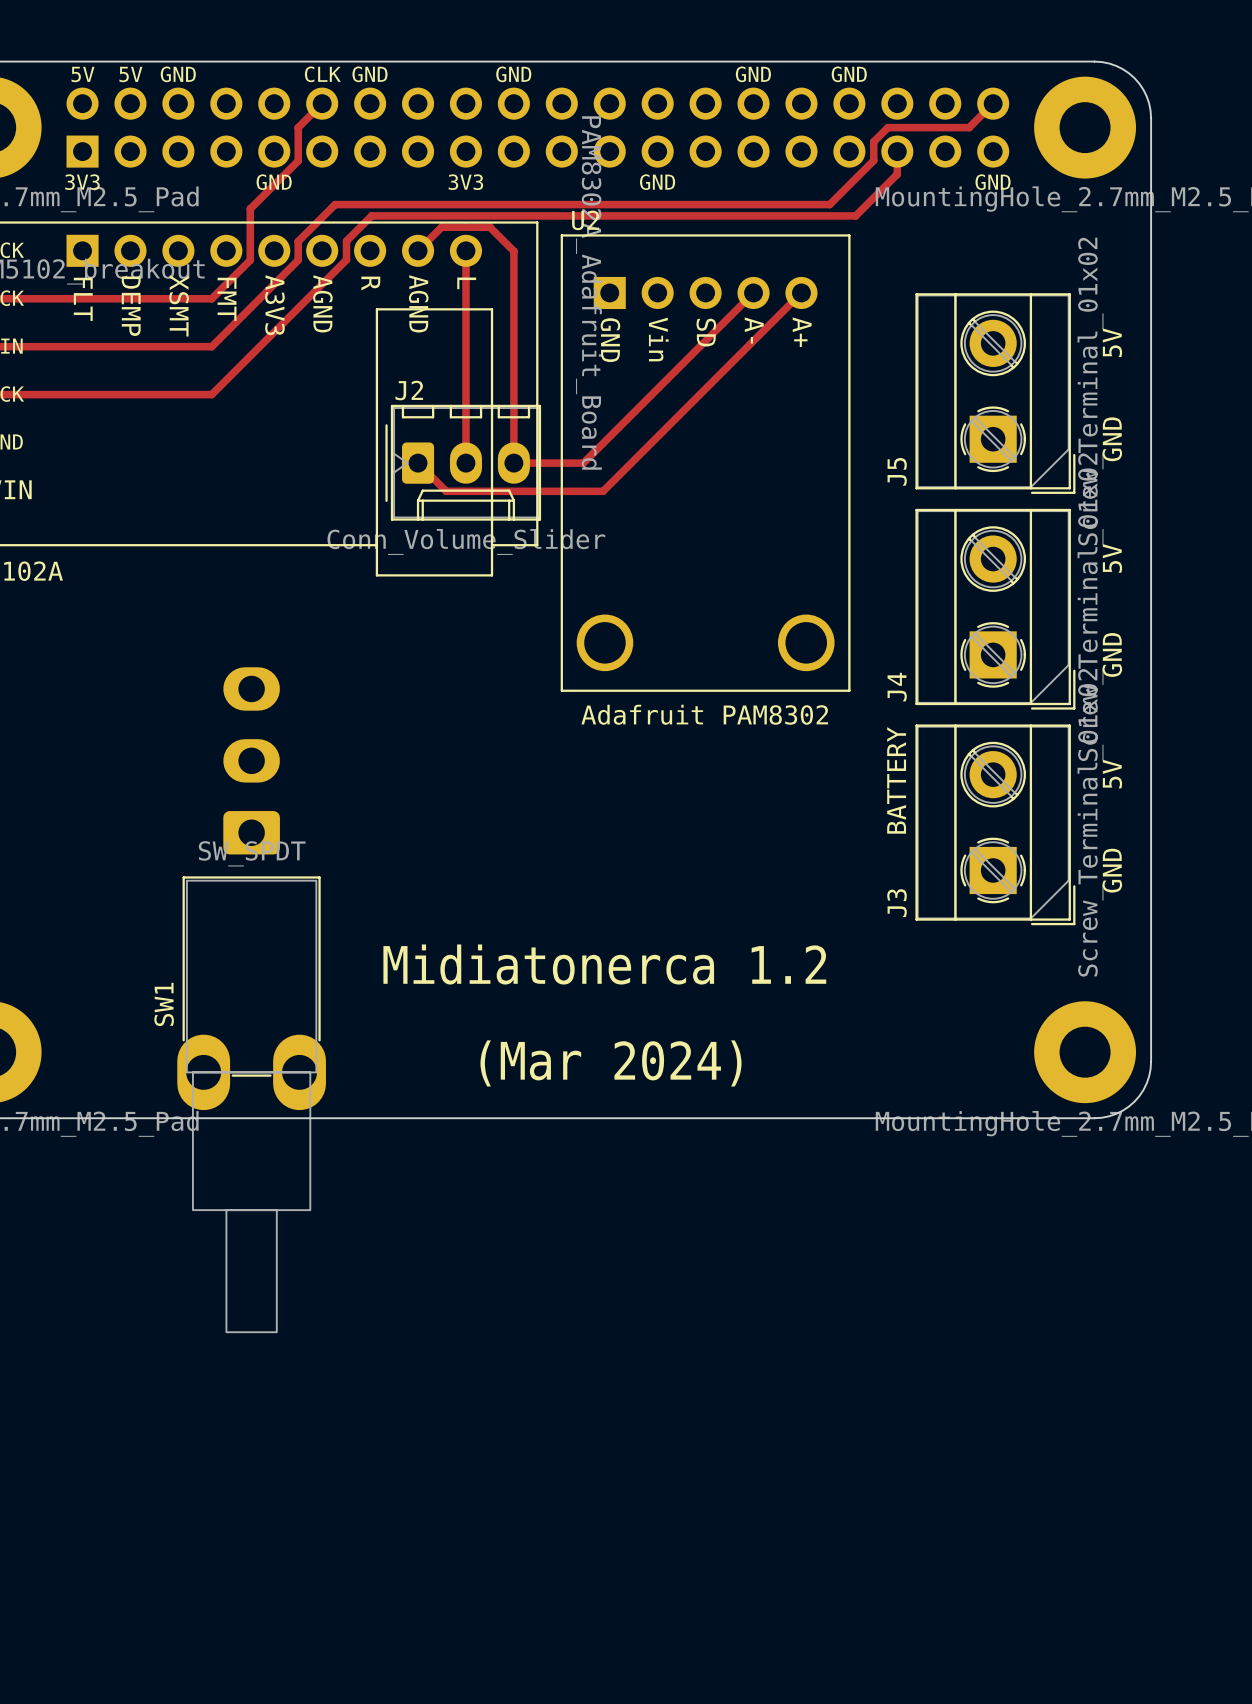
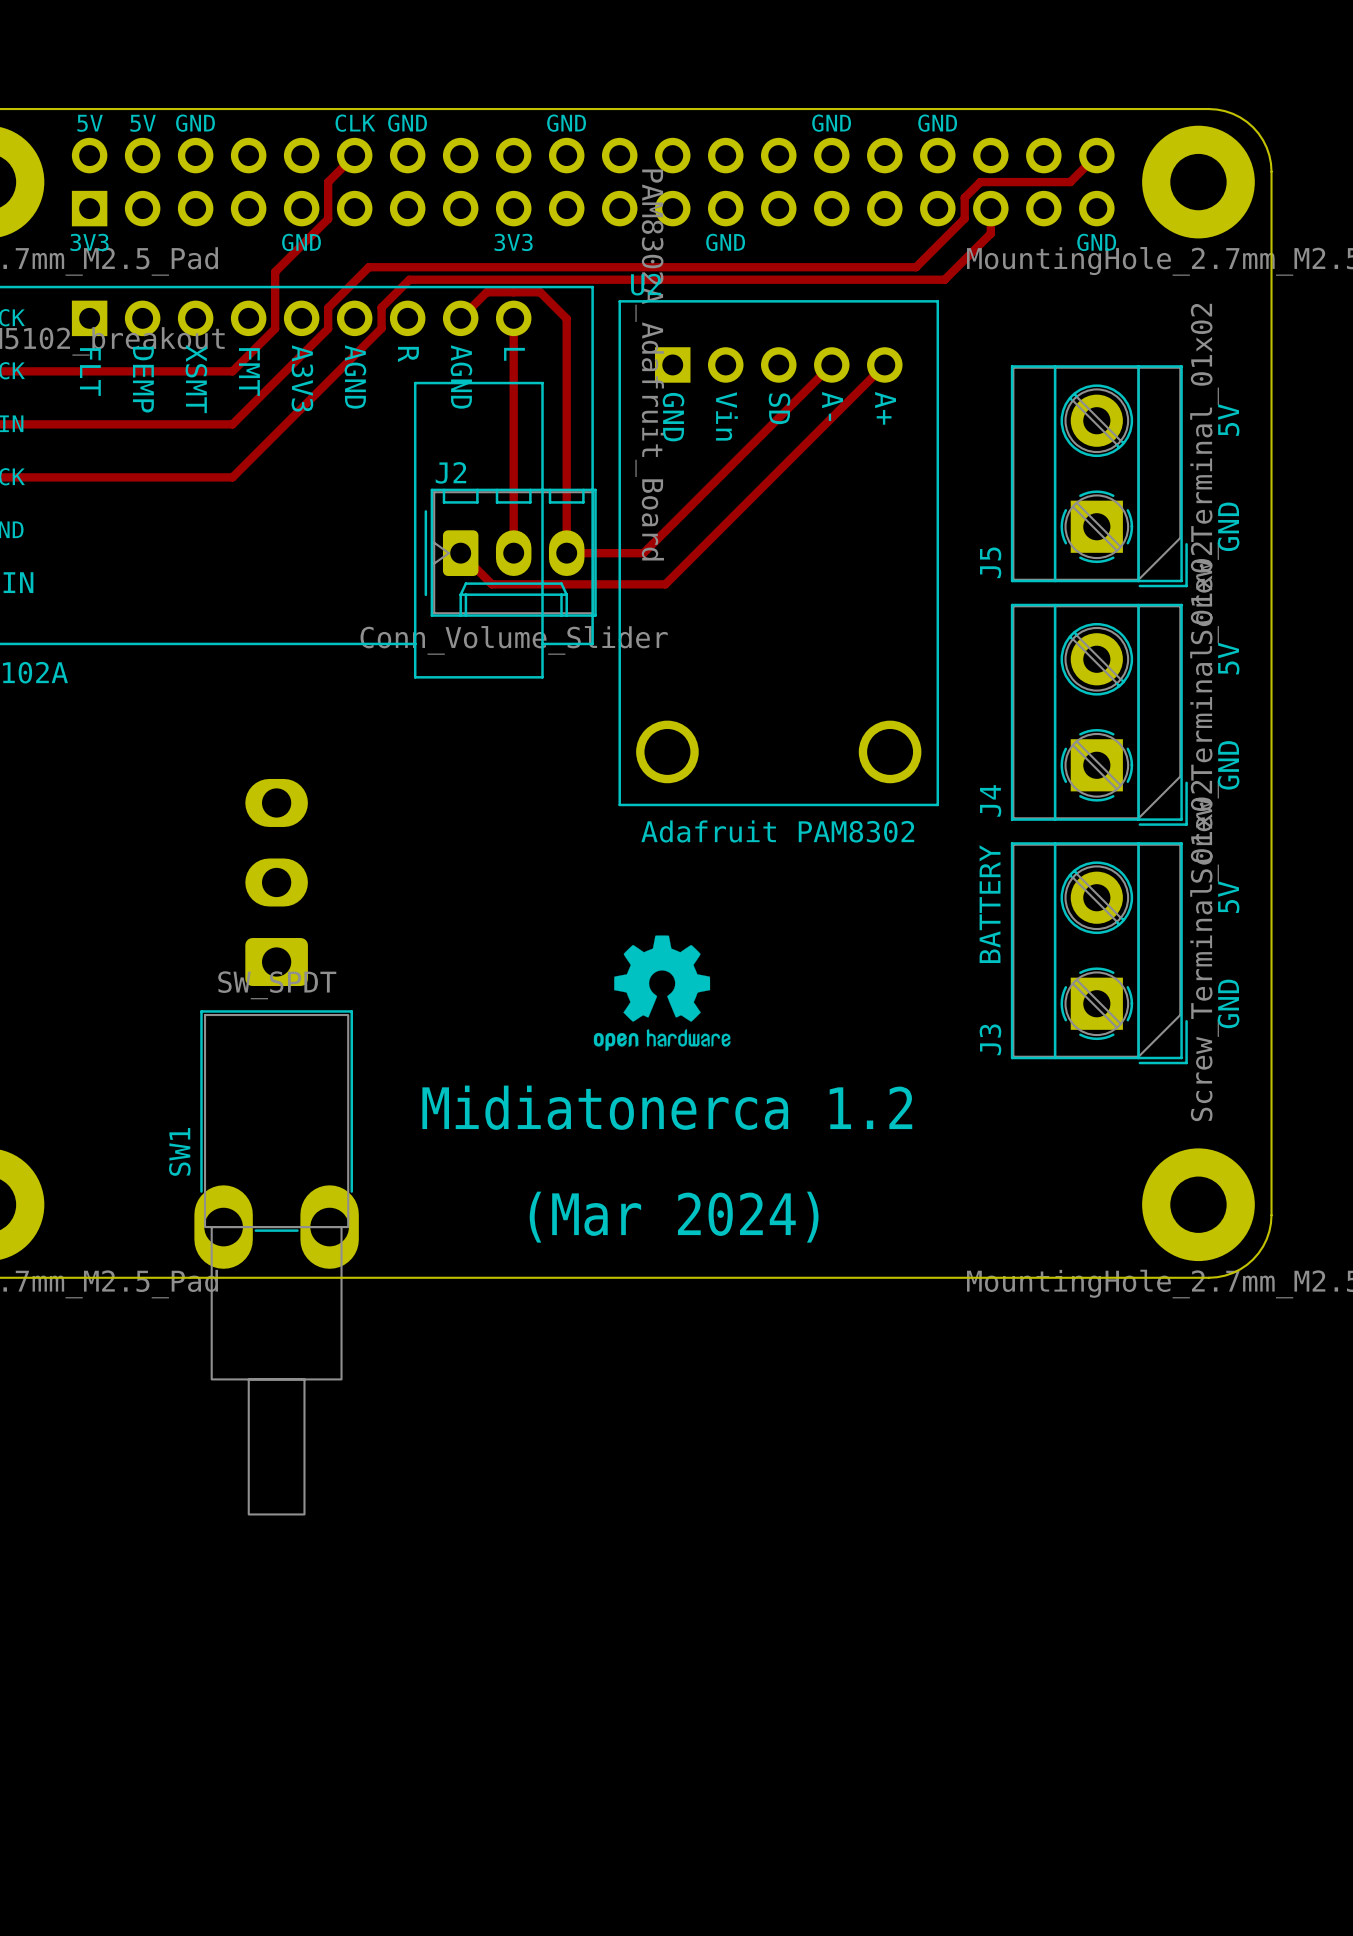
drawing: none -> [593, 935, 731, 1052]

